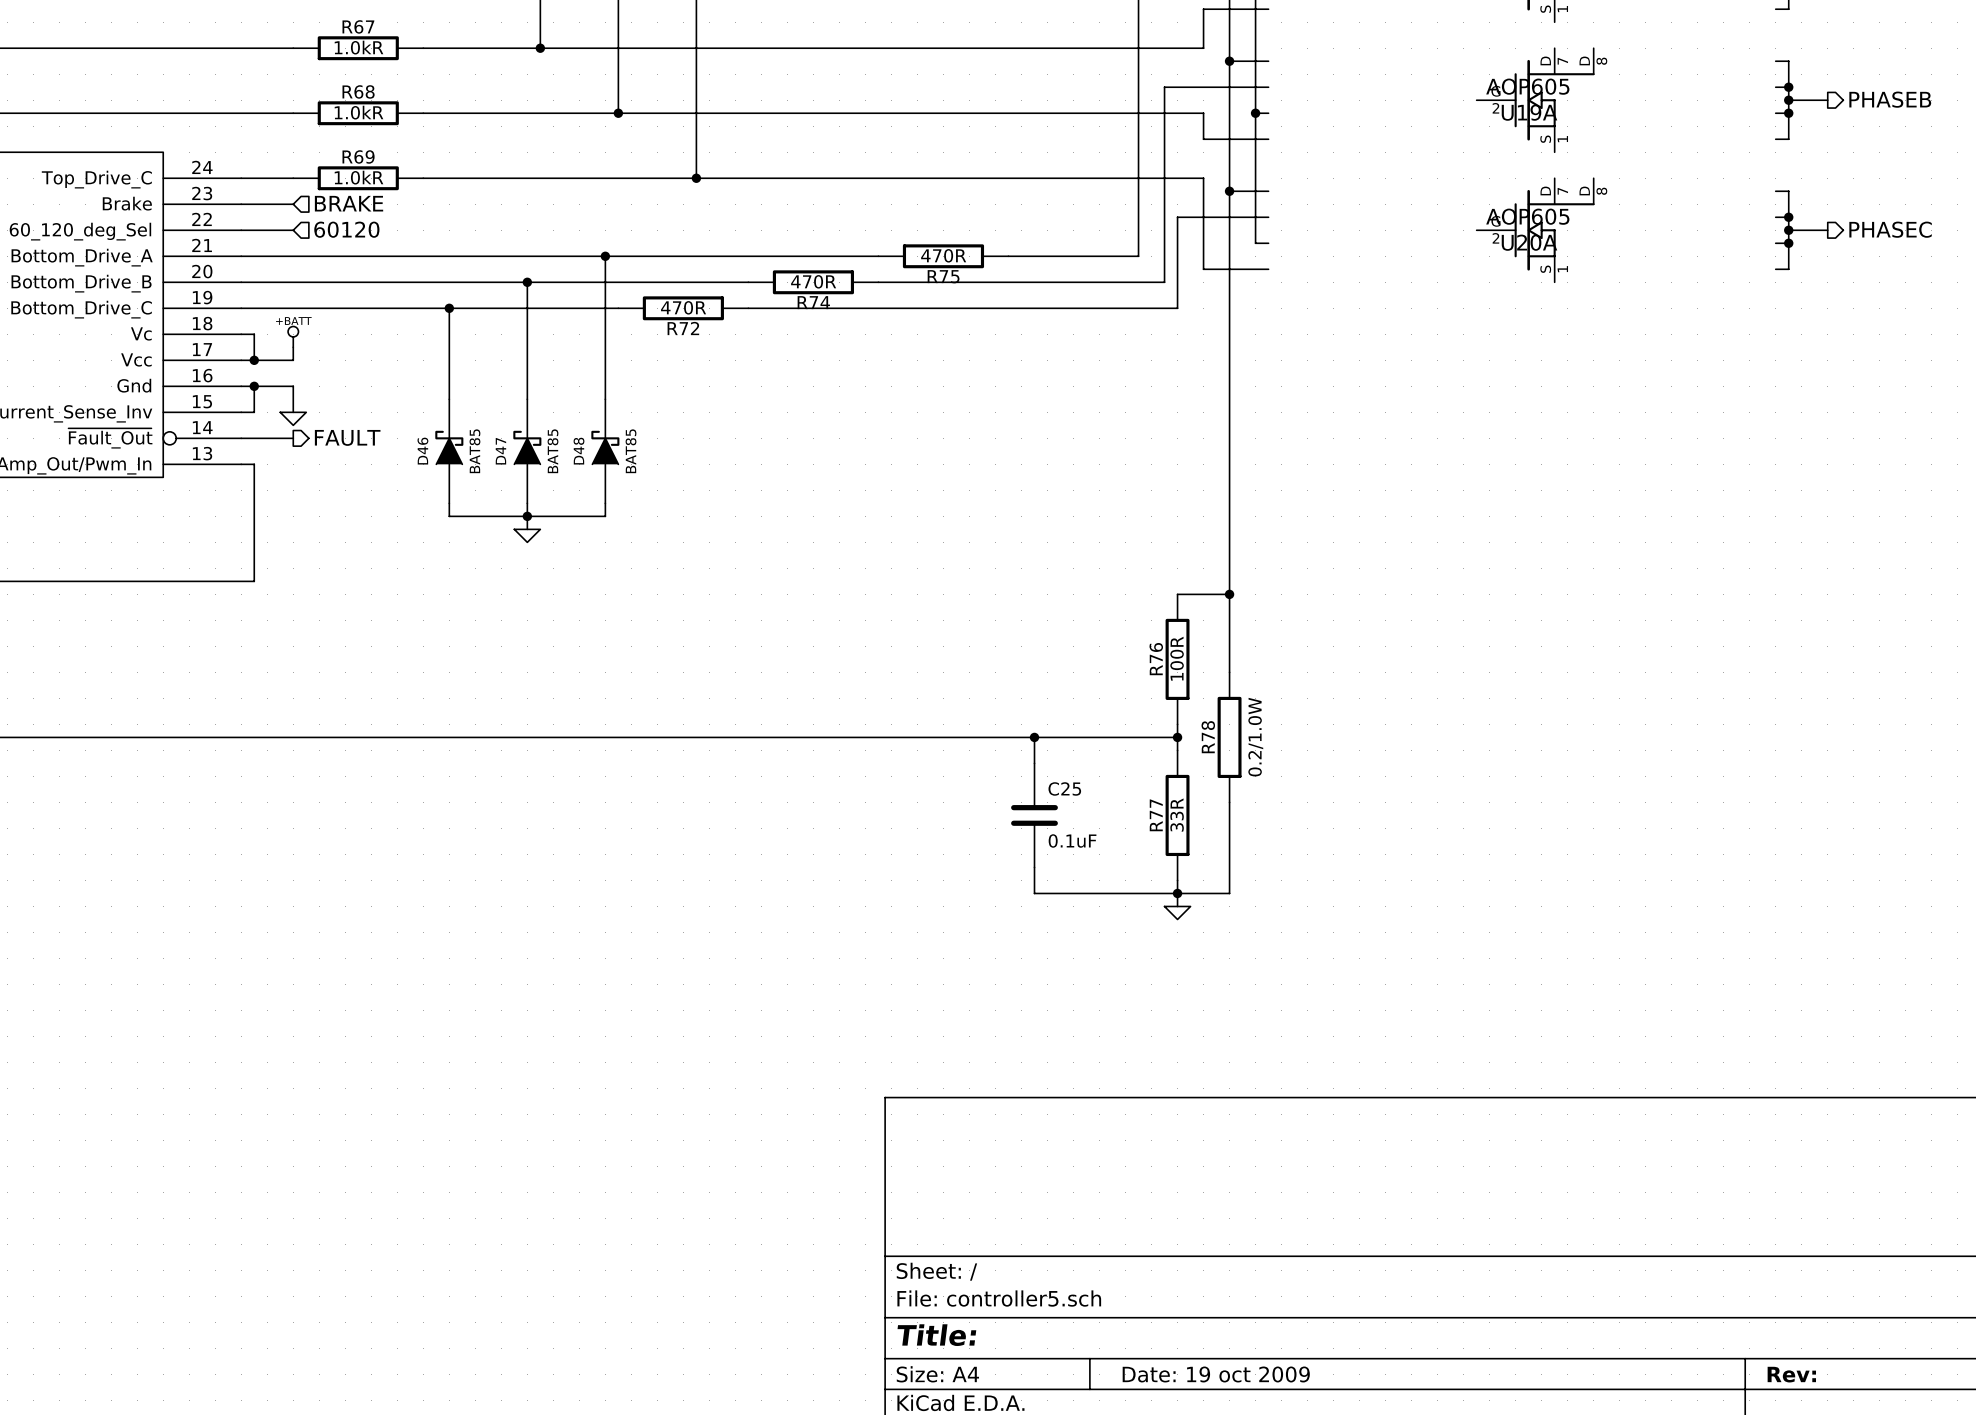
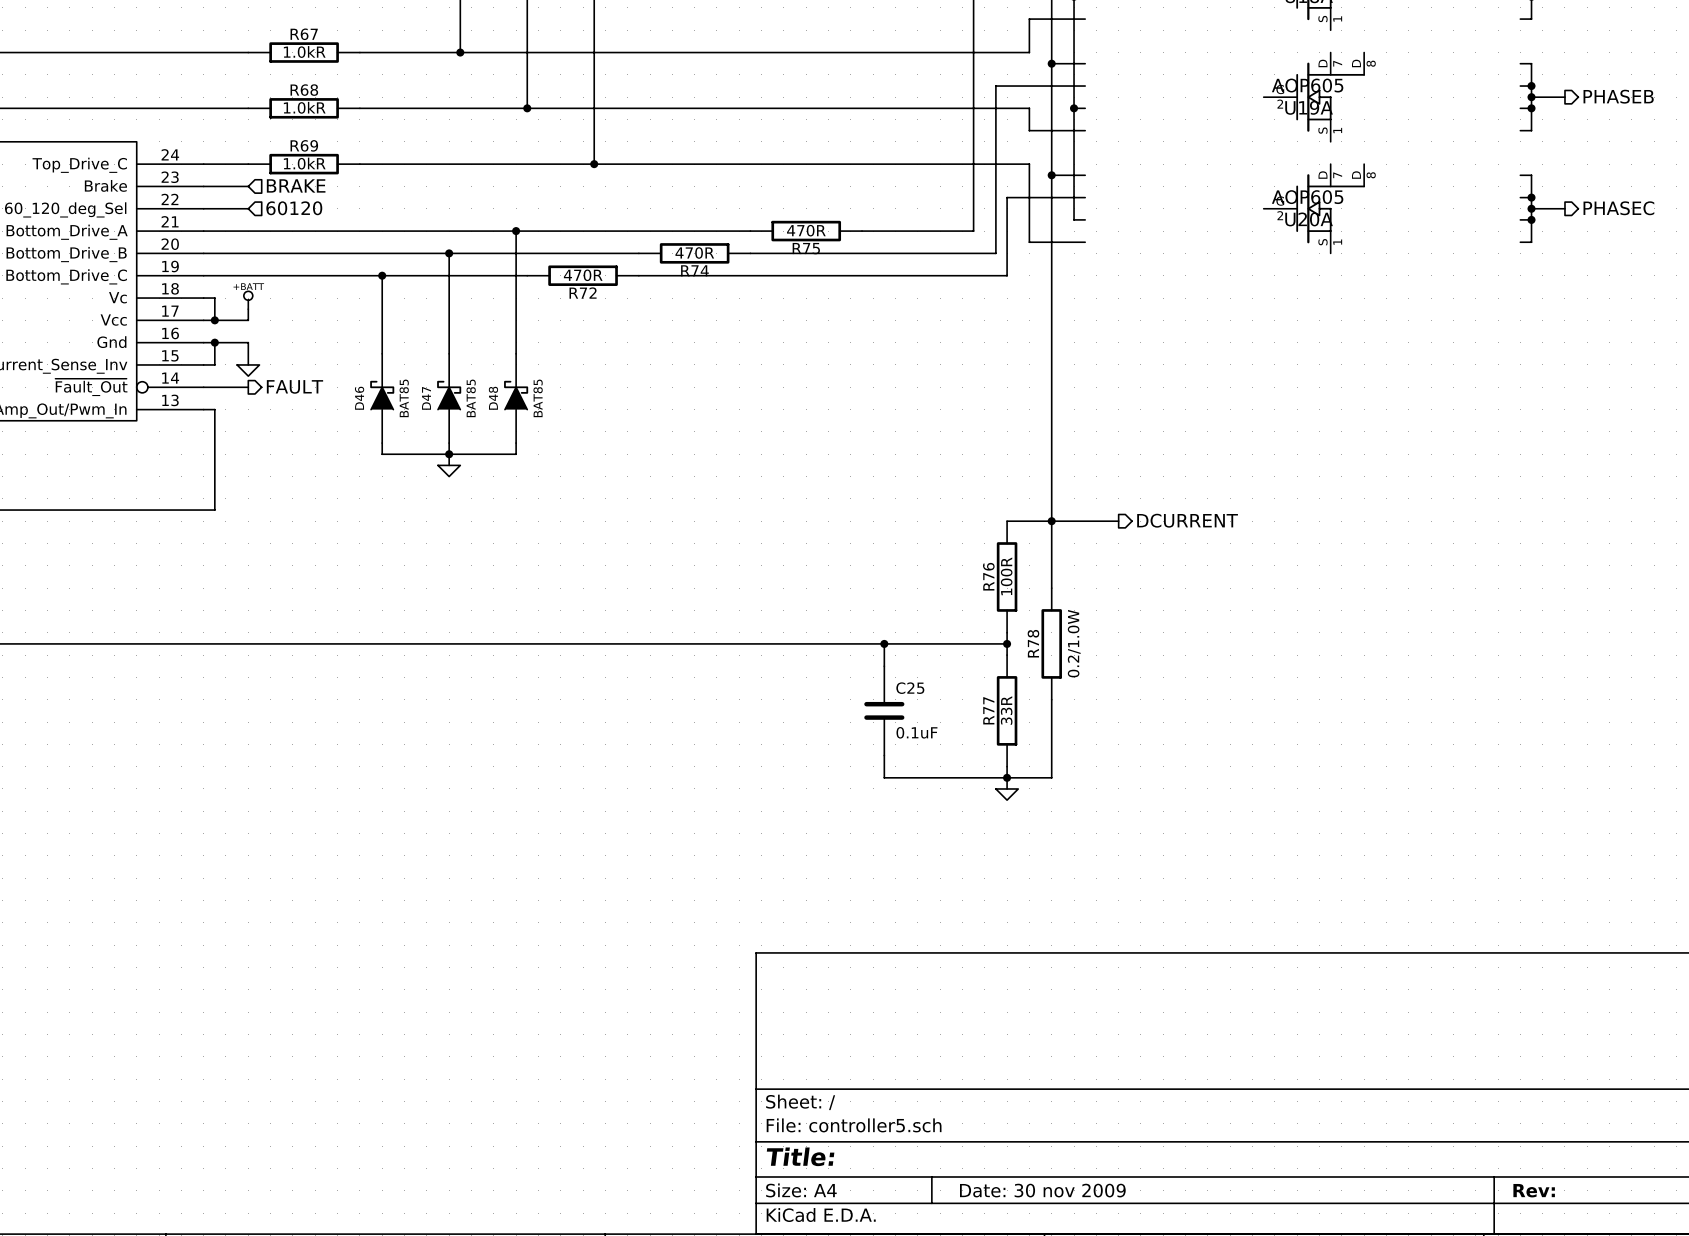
hierarchical label: none -> DCURRENT (1187, 520)
wire: none -> (1051, 521) (1118, 521)
title block: Date: 19 oct 2009 (1216, 1374) -> Date: 30 nov 2009 (1042, 1190)

